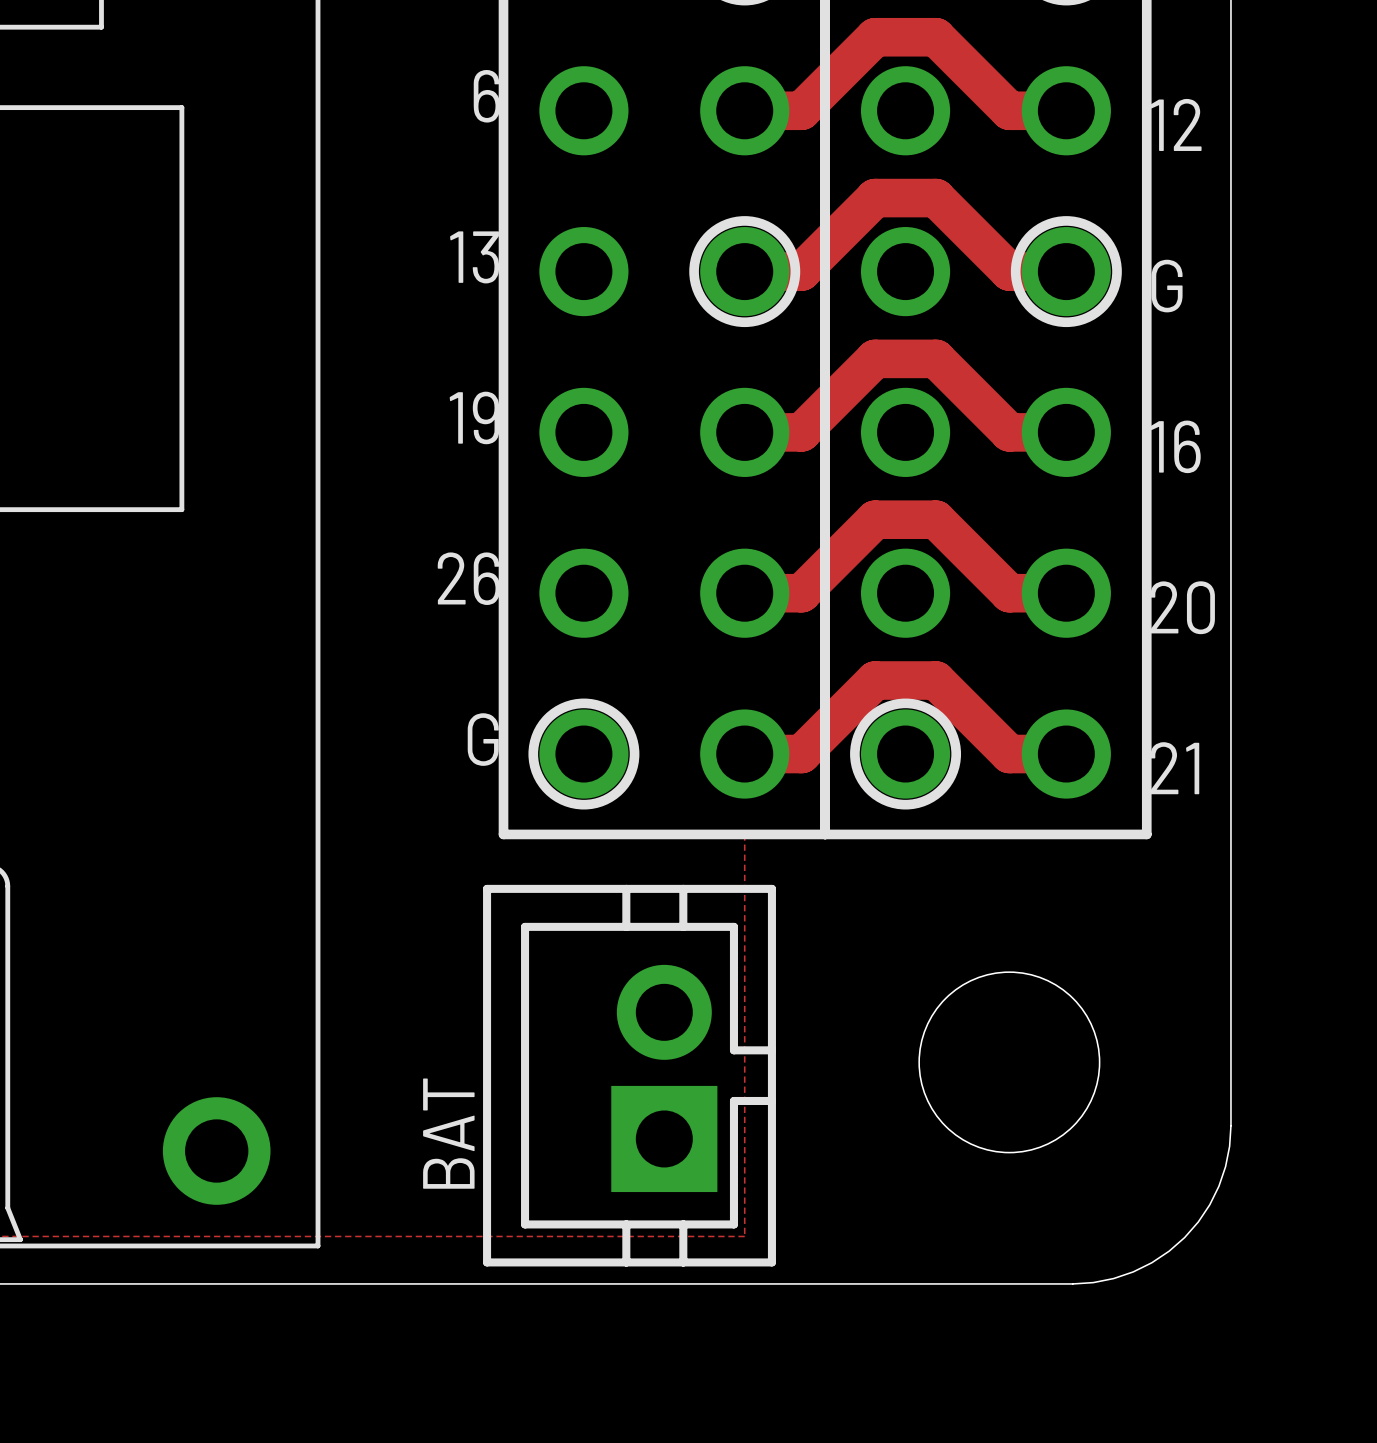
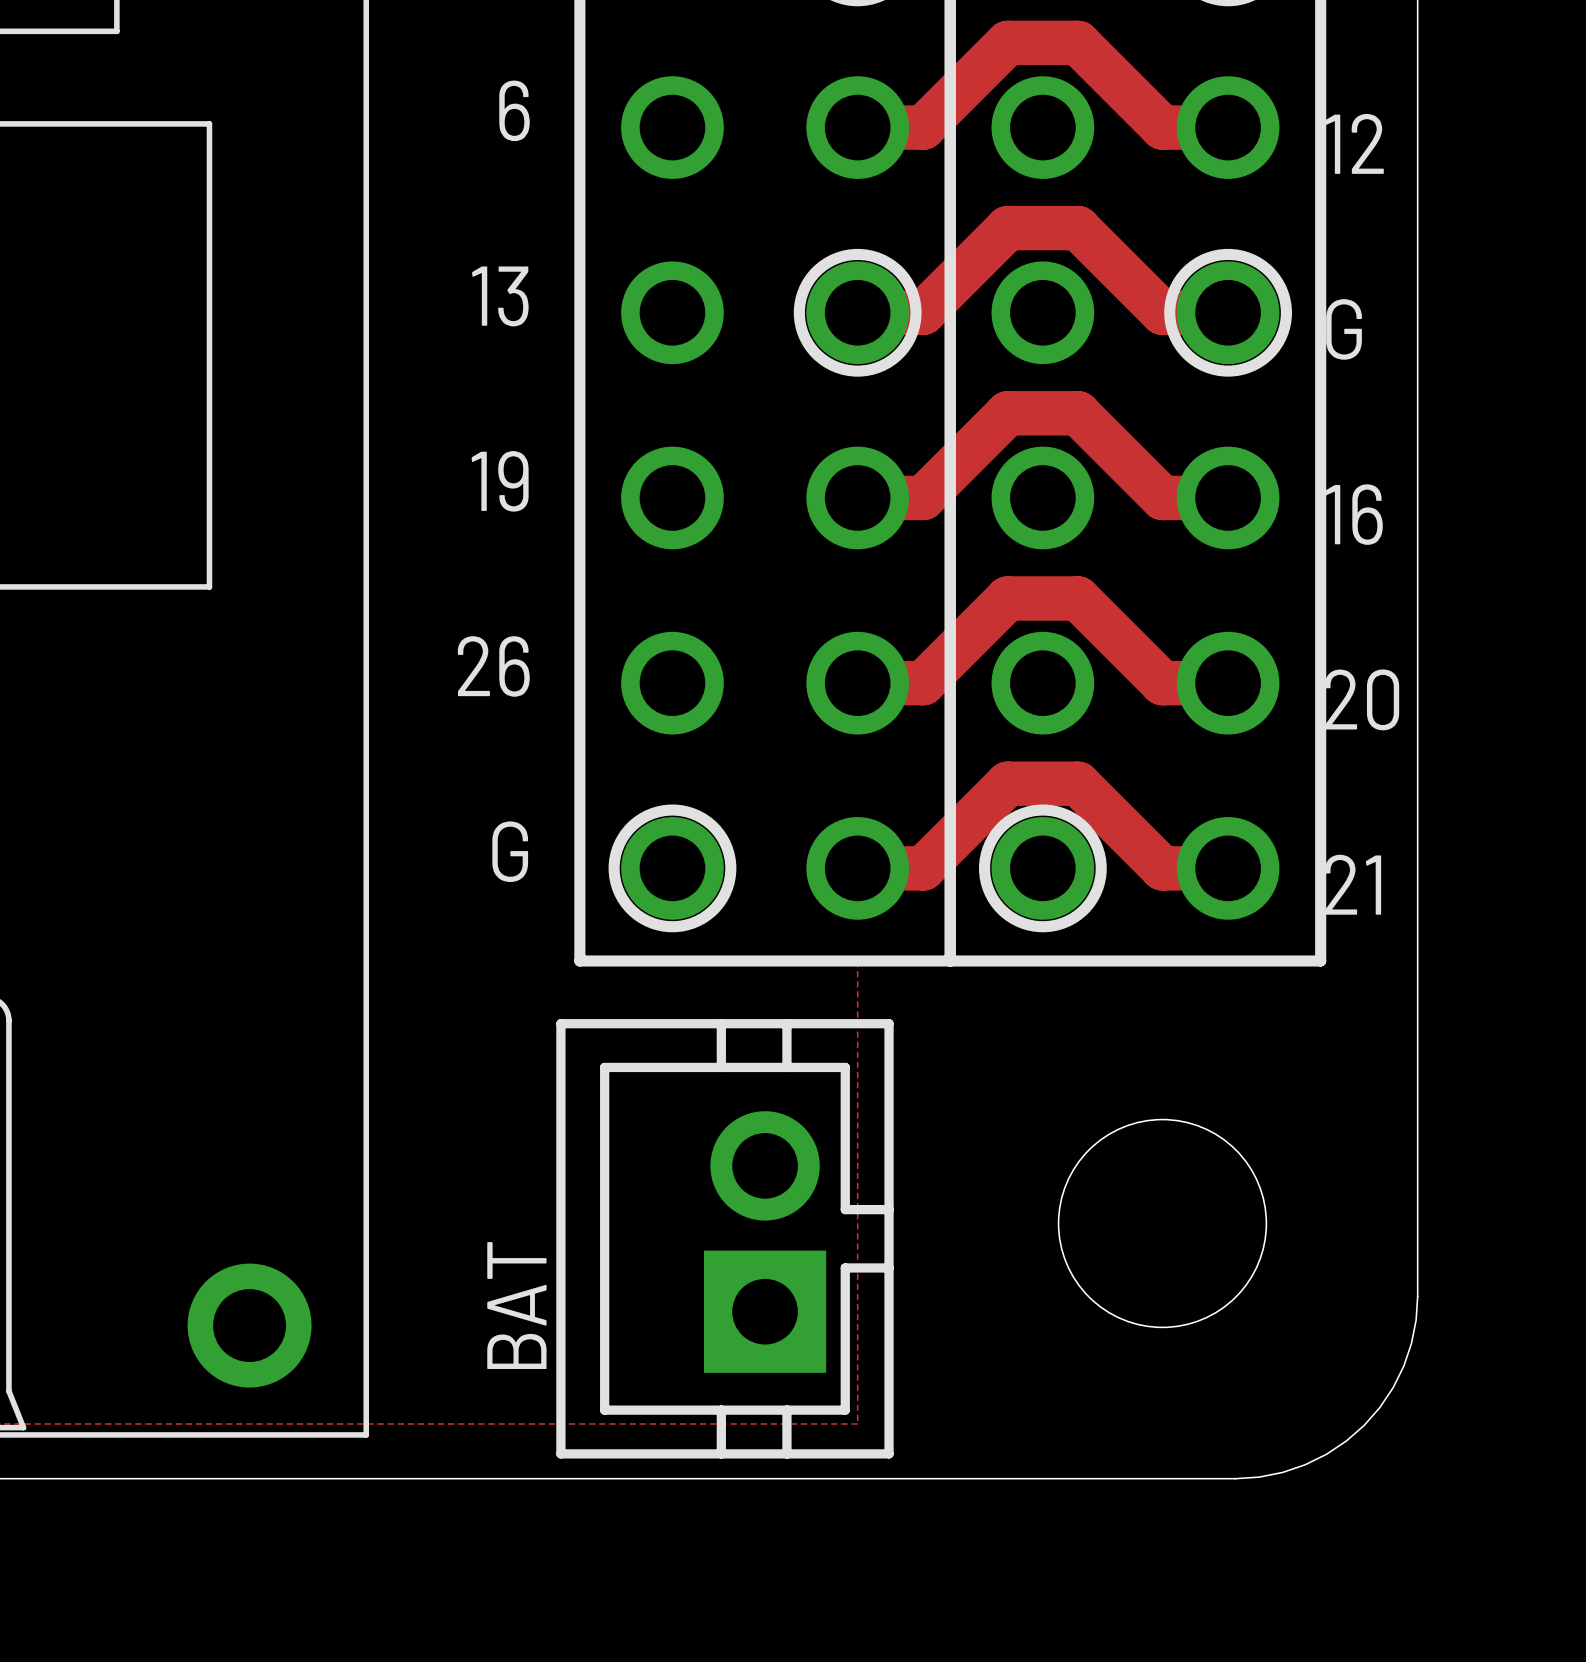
text position: 6 (486, 96) -> 6 (514, 110)
text position: 13 (474, 257) -> 13 (500, 296)
text position: 19 (474, 417) -> 19 (500, 481)
text position: 26 (468, 578) -> 26 (493, 666)
text position: G (483, 739) -> G (510, 851)

